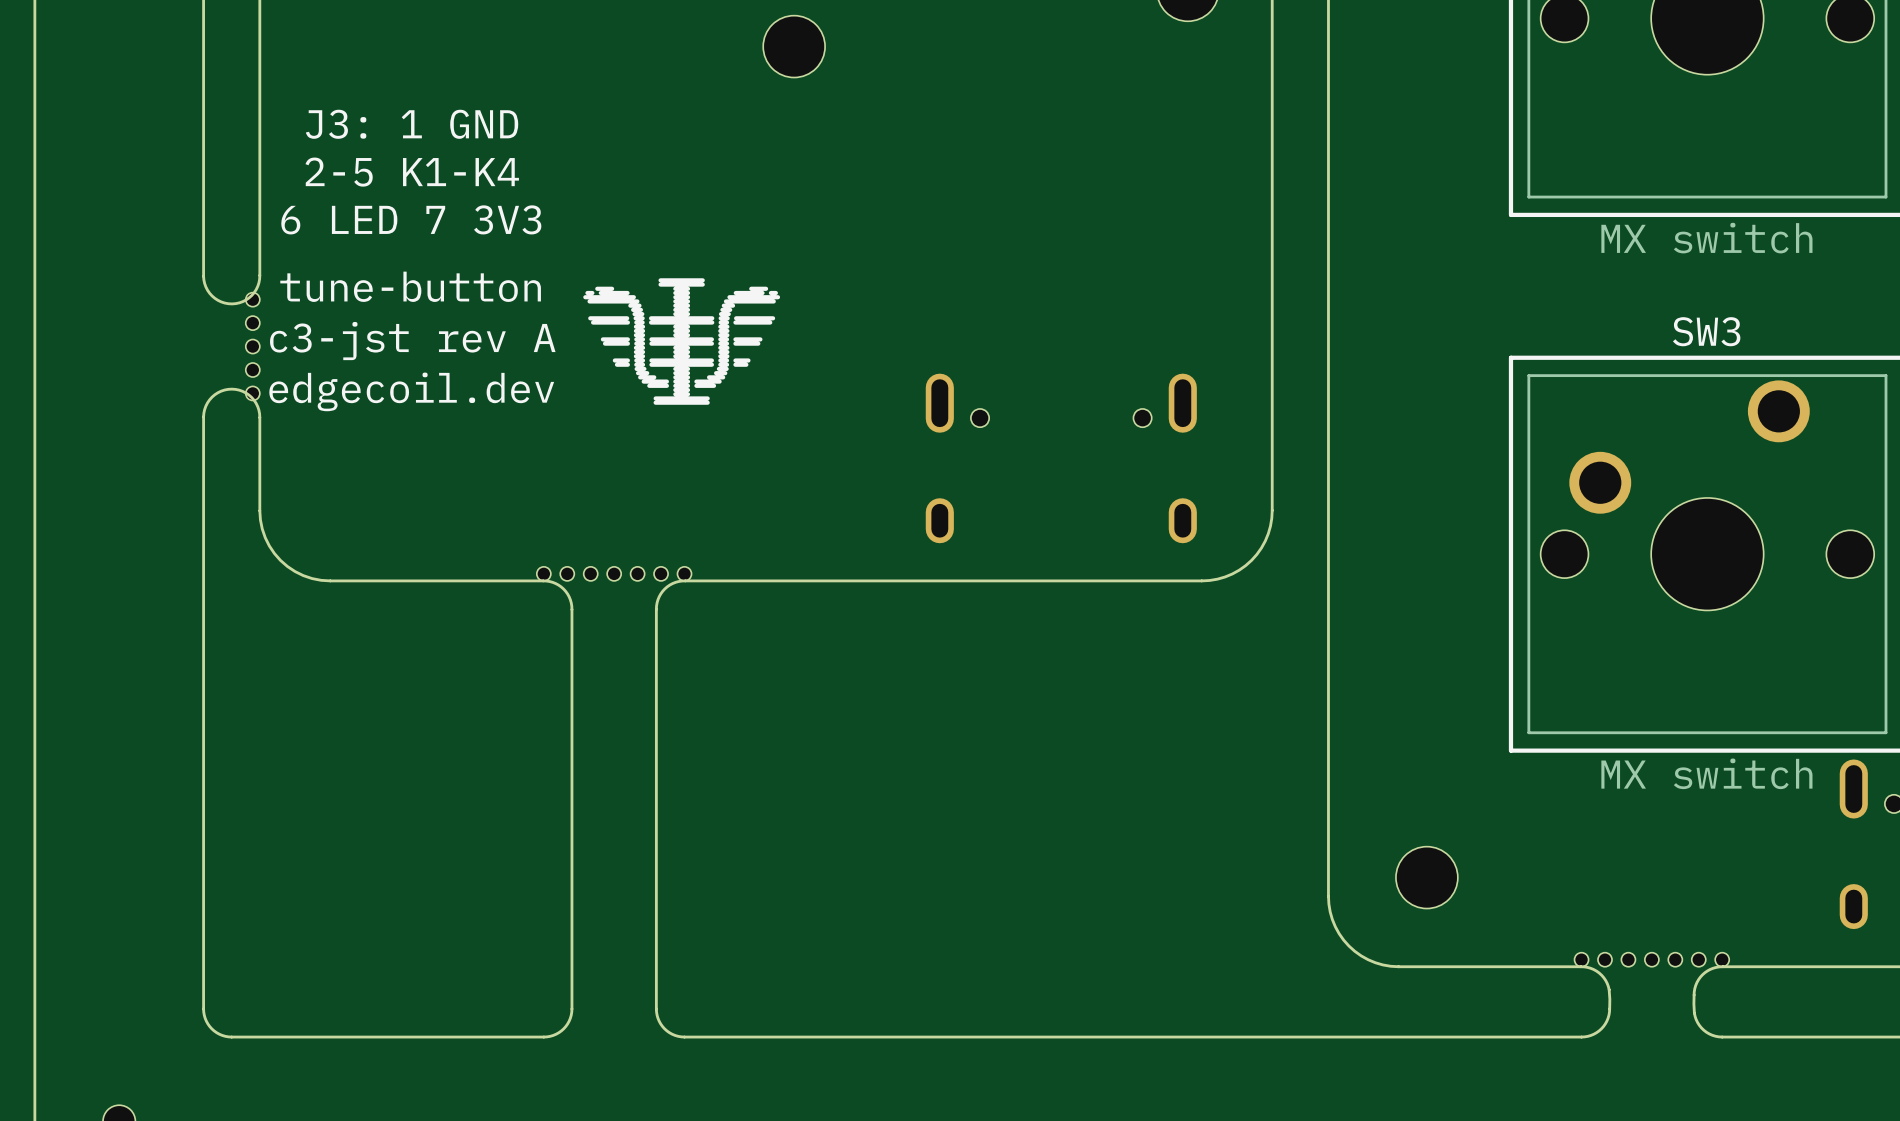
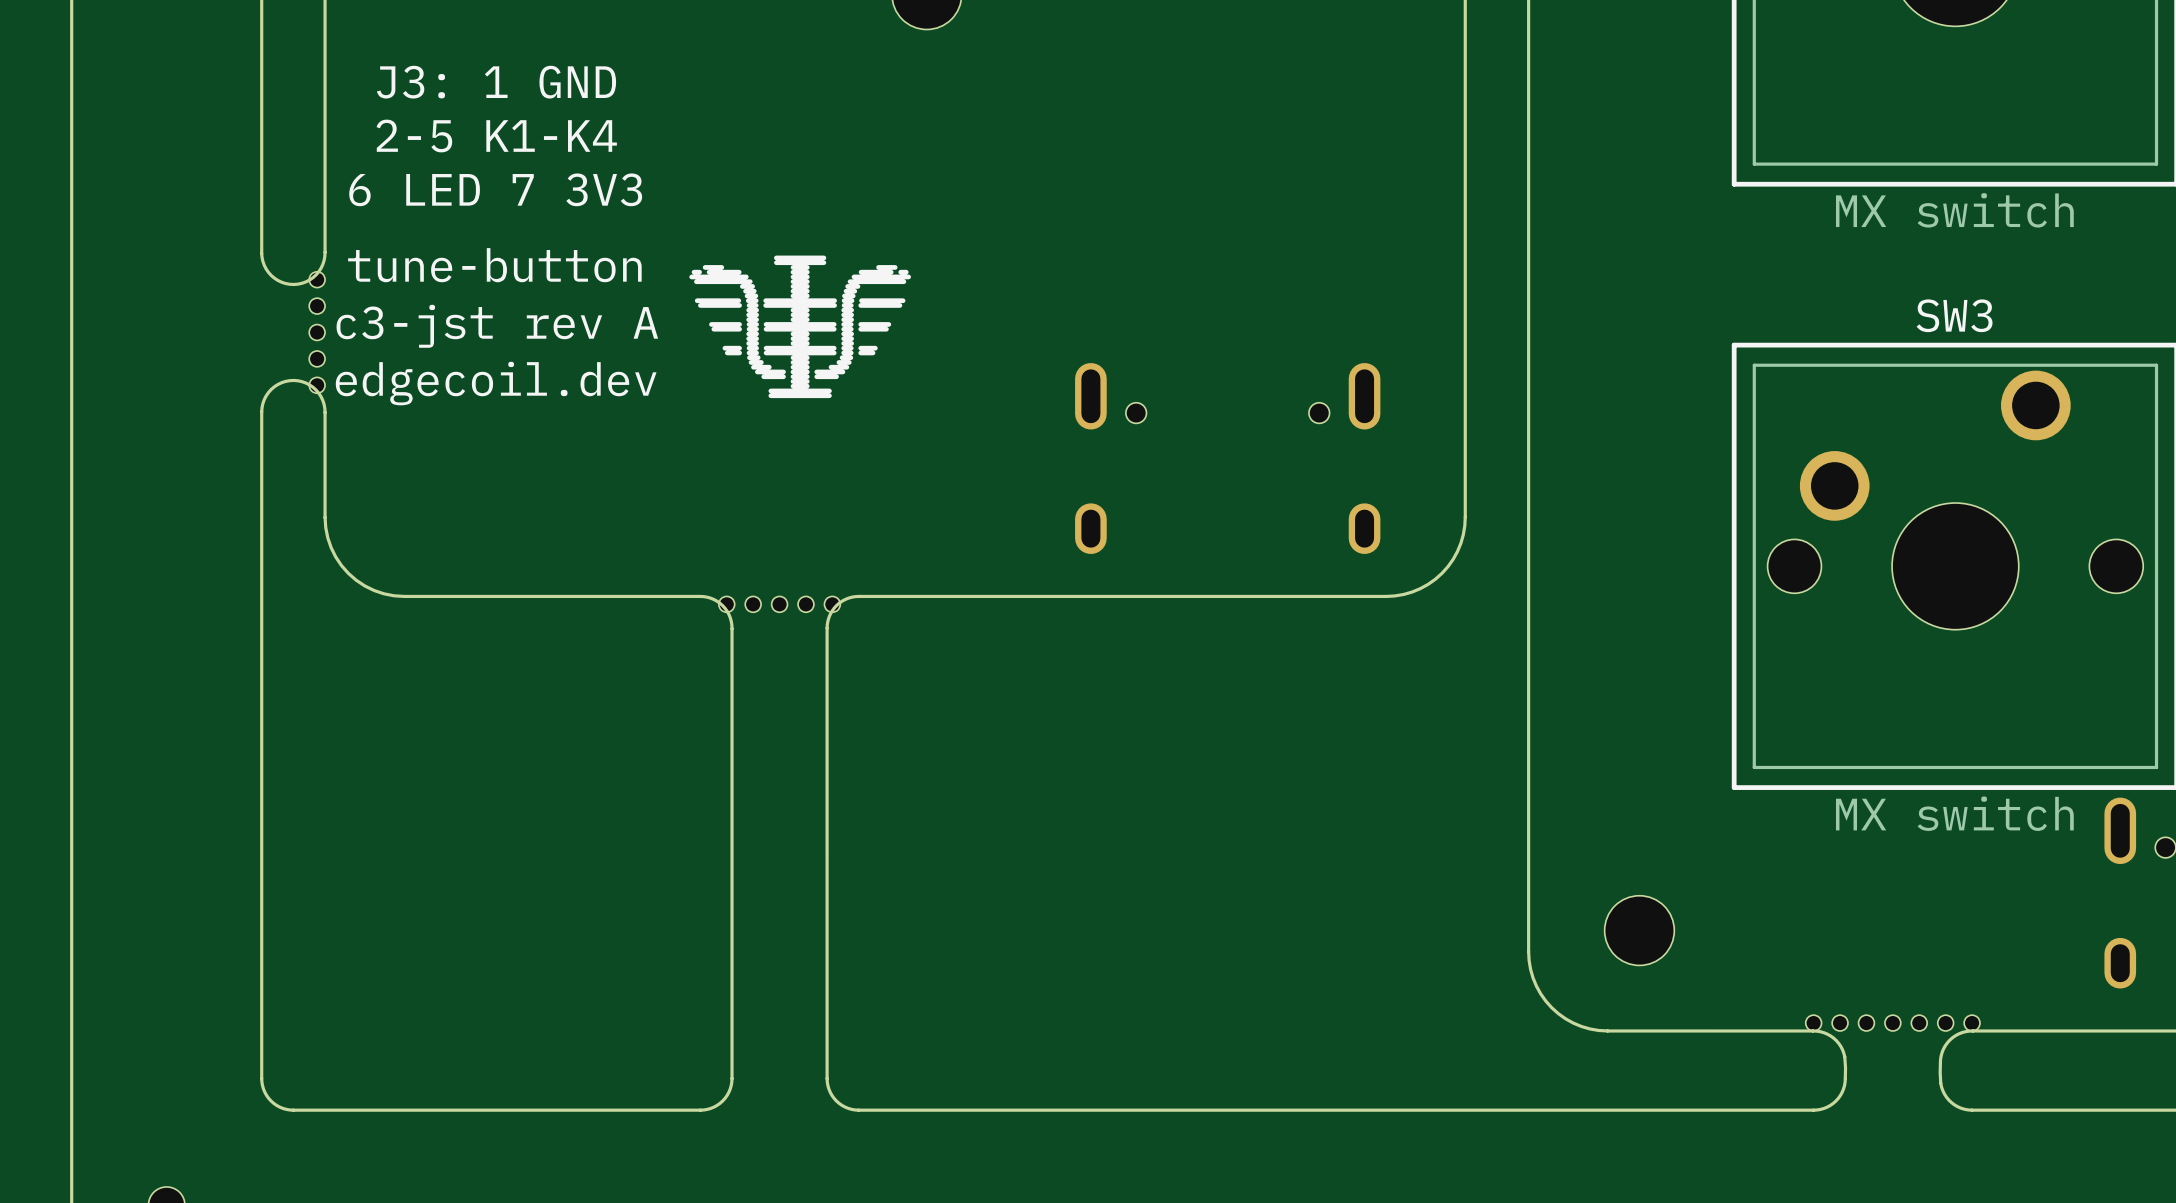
part: (543, 573) -> none
part: (567, 573) -> none
part: (590, 573) -> none
part: (614, 573) -> none
part: (637, 573) -> none
part: (661, 573) -> none
part: (684, 573) -> none
board edge: (543, 580) (552, 582) (563, 589) (569, 596) (571, 609) (571, 1012) (567, 1023) (561, 1030) (553, 1035) (543, 1037) -> (644, 596) (710, 598) (719, 603) (727, 611) (732, 628) (731, 1085) (722, 1100) (707, 1109) (644, 1110)
board edge: (734, 580) (675, 582) (662, 591) (657, 599) (656, 609) (657, 1015) (664, 1028) (678, 1036) (733, 1037) -> (859, 596) (845, 599) (836, 605) (830, 614) (827, 628) (827, 1082) (830, 1092) (836, 1100) (845, 1107) (858, 1110)
part: none -> (726, 604)
part: none -> (753, 604)
part: none -> (779, 604)
part: none -> (805, 604)
part: none -> (832, 604)

